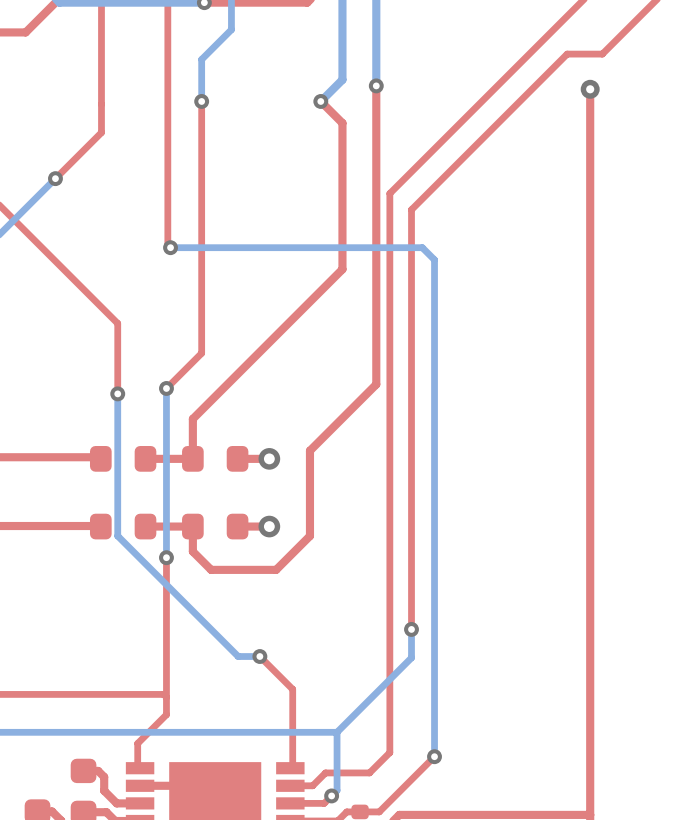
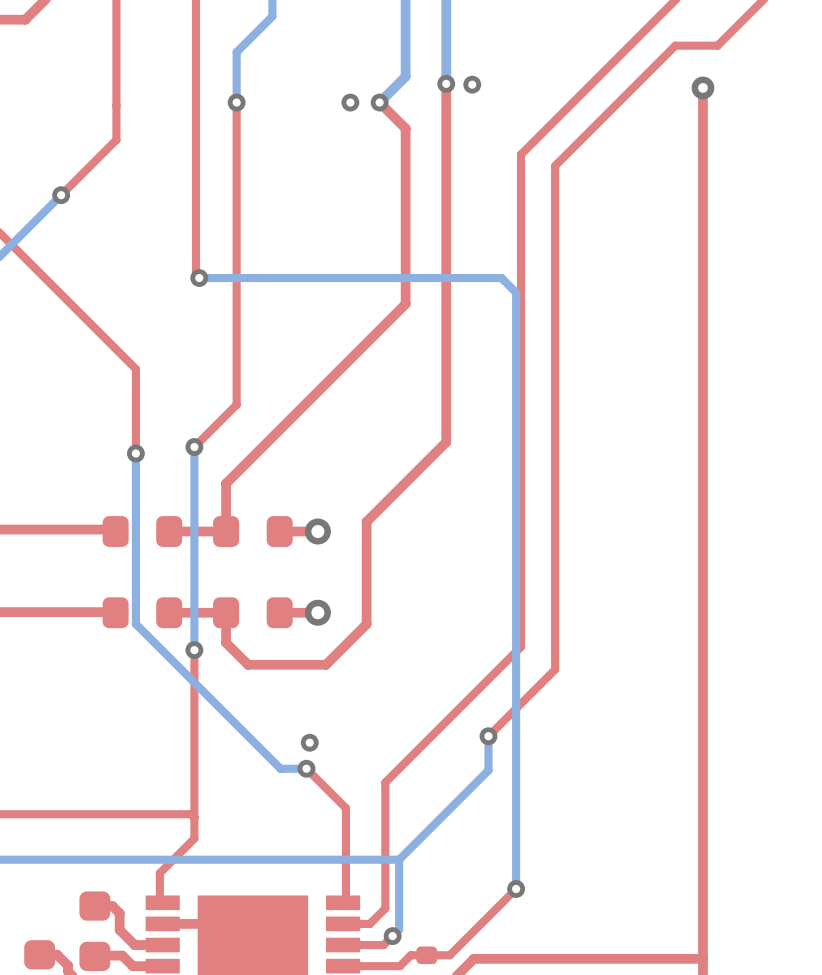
via: none -> (472, 84)
via: none -> (350, 102)
top track: (438, 144) (389, 193) (389, 752) (369, 772) (325, 772) -> (520, 154) (520, 646) (385, 782) (385, 908)
top track: (467, 154) (411, 209) (411, 629) -> (555, 165) (555, 669) (488, 736)
via: none -> (309, 742)

